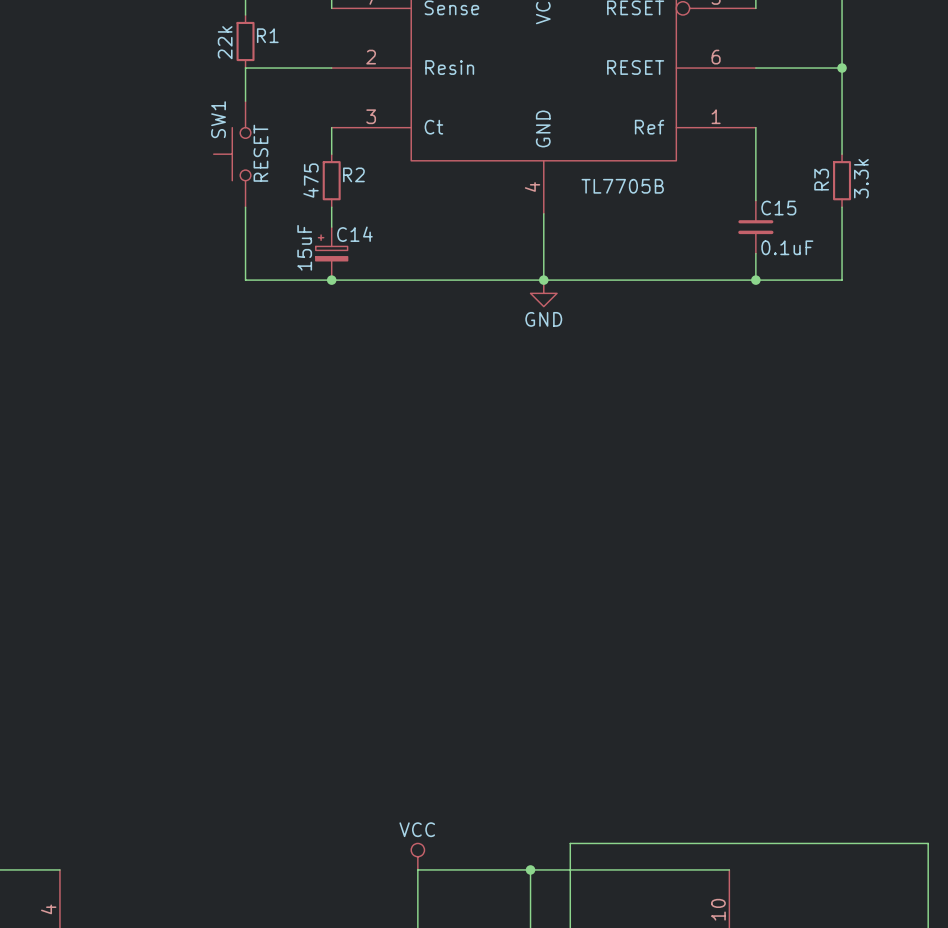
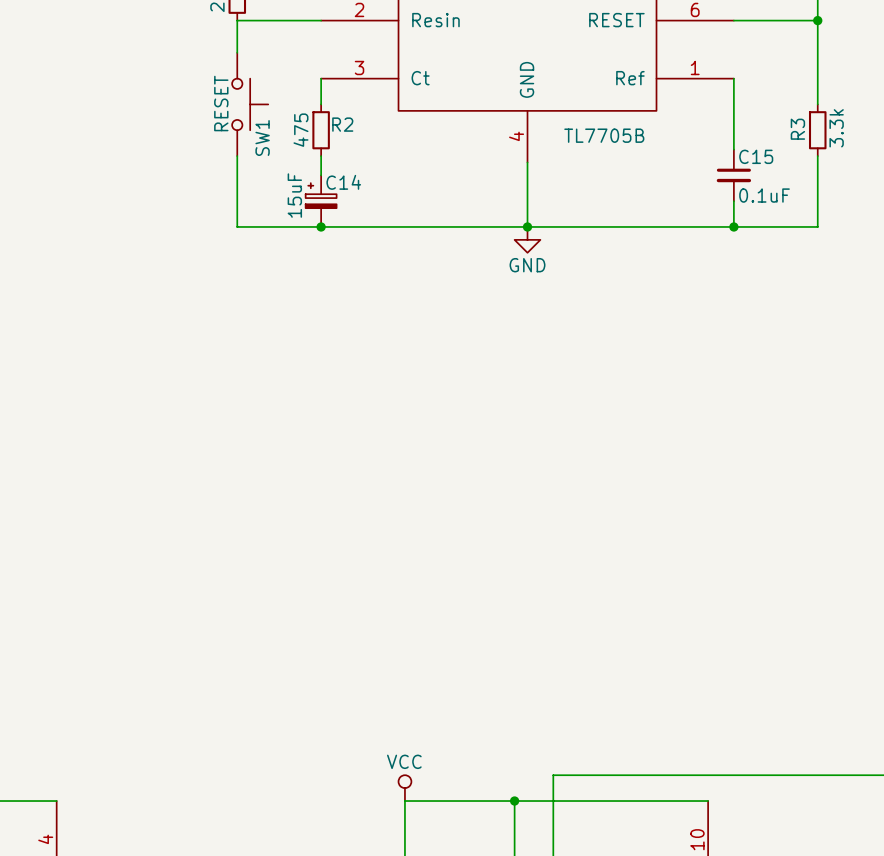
SW1 rotation: 0° (232, 154) -> 180° (250, 104)

